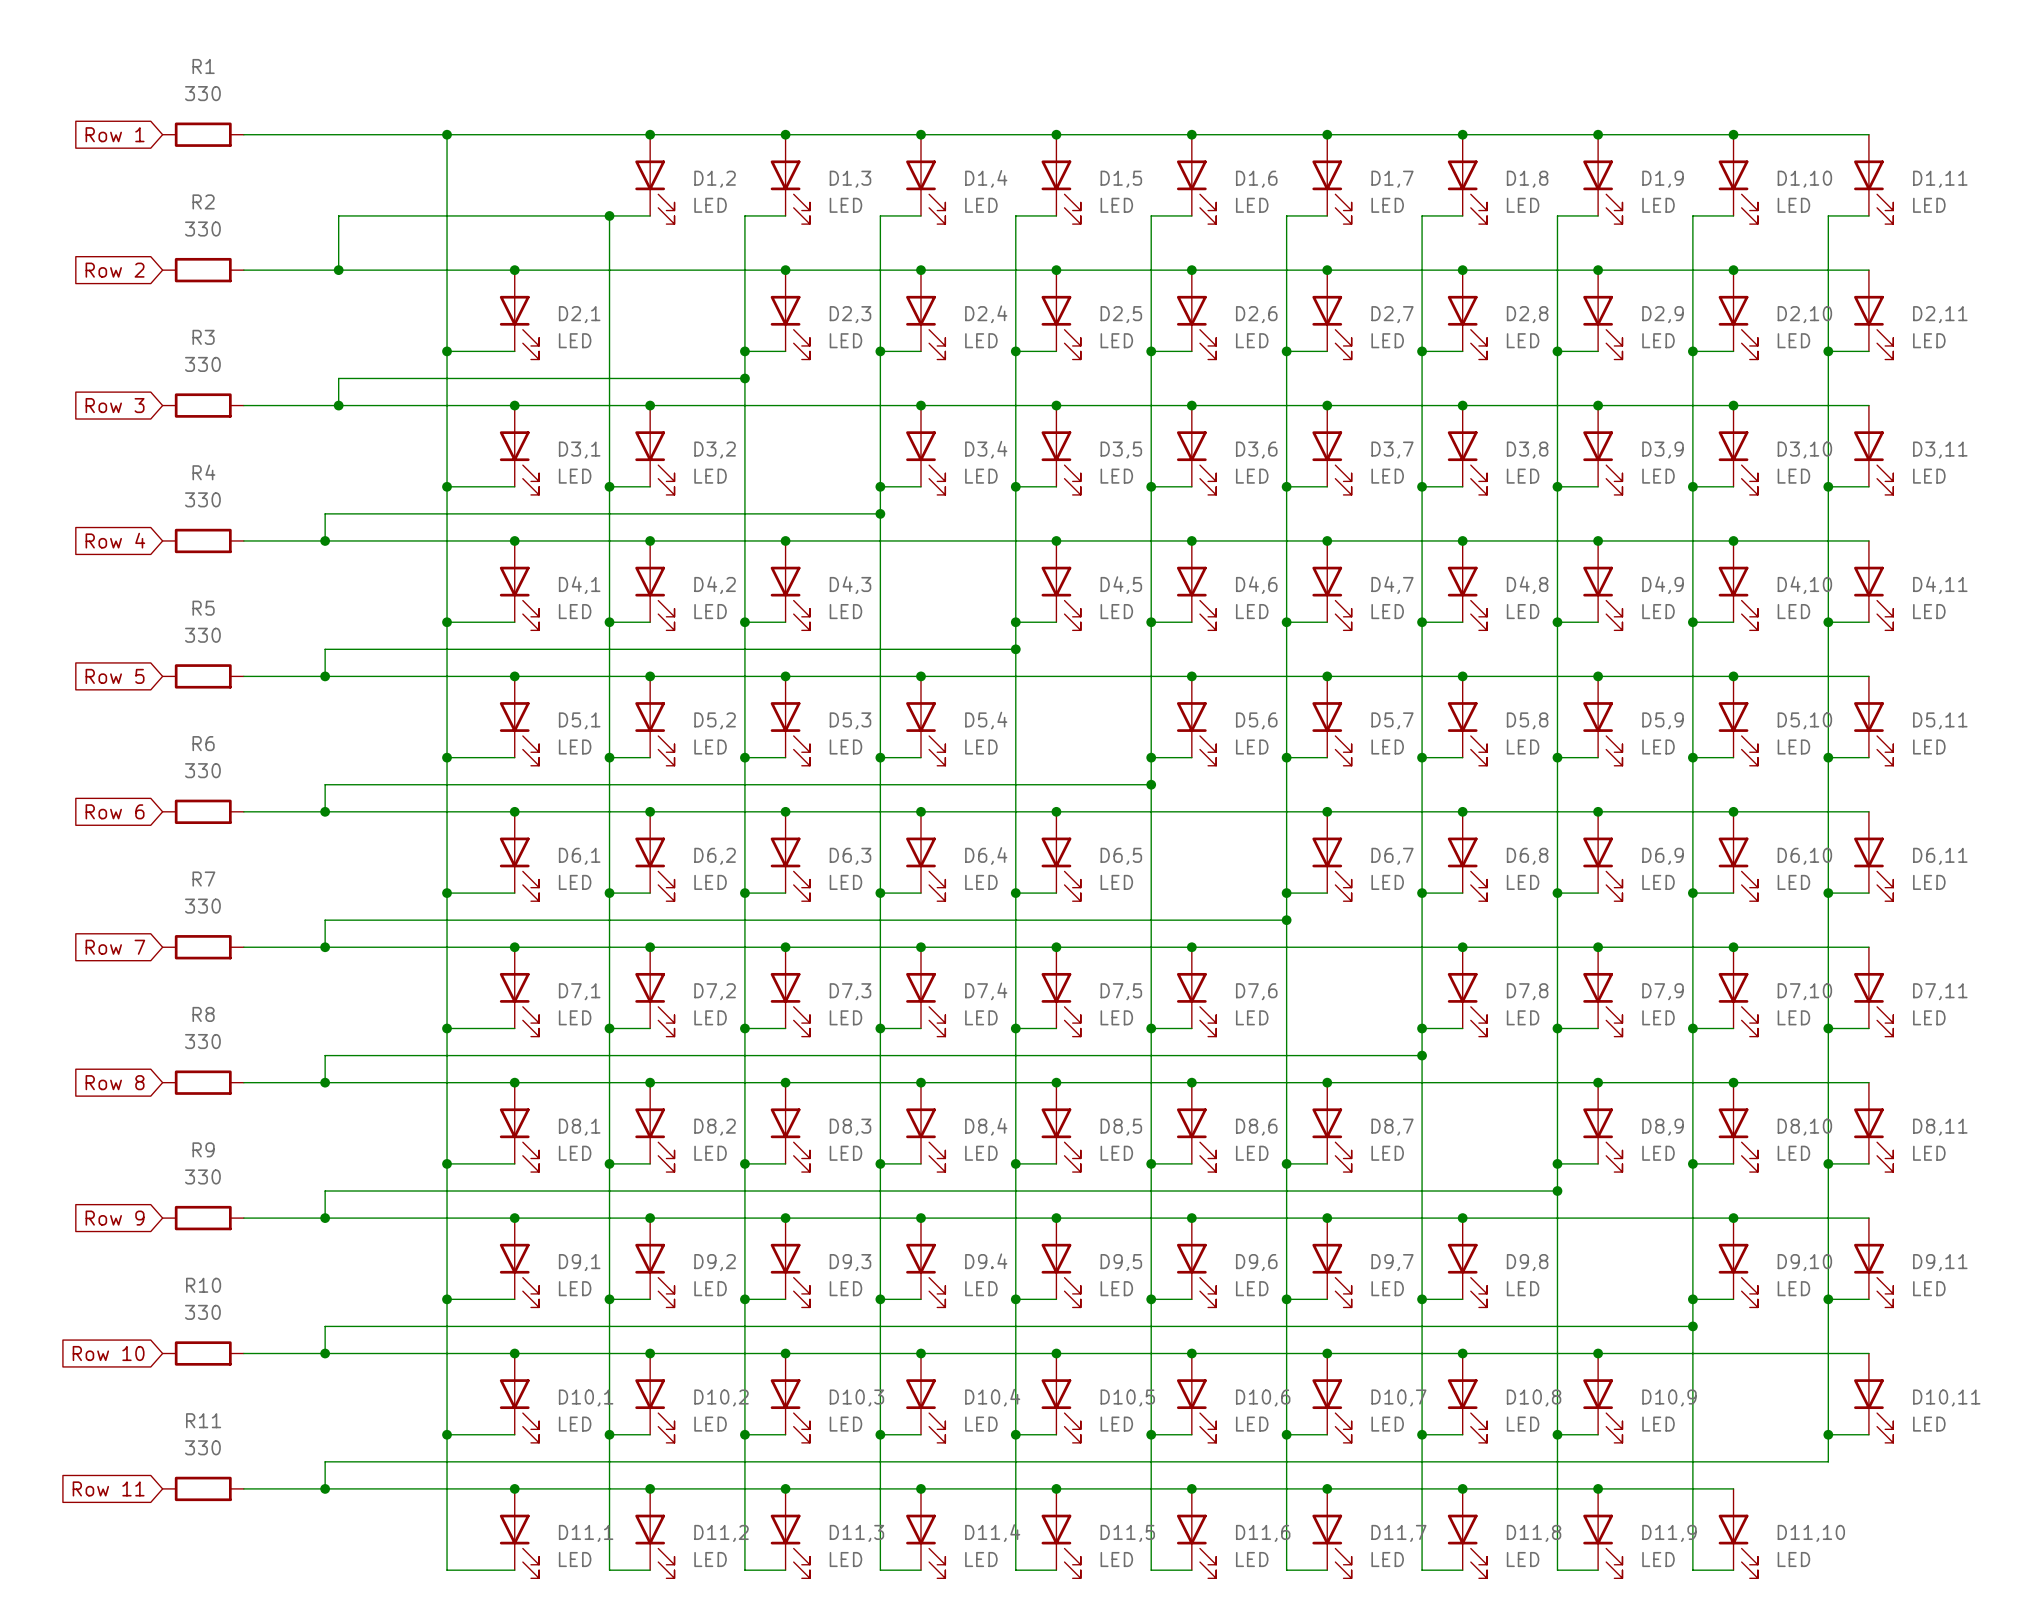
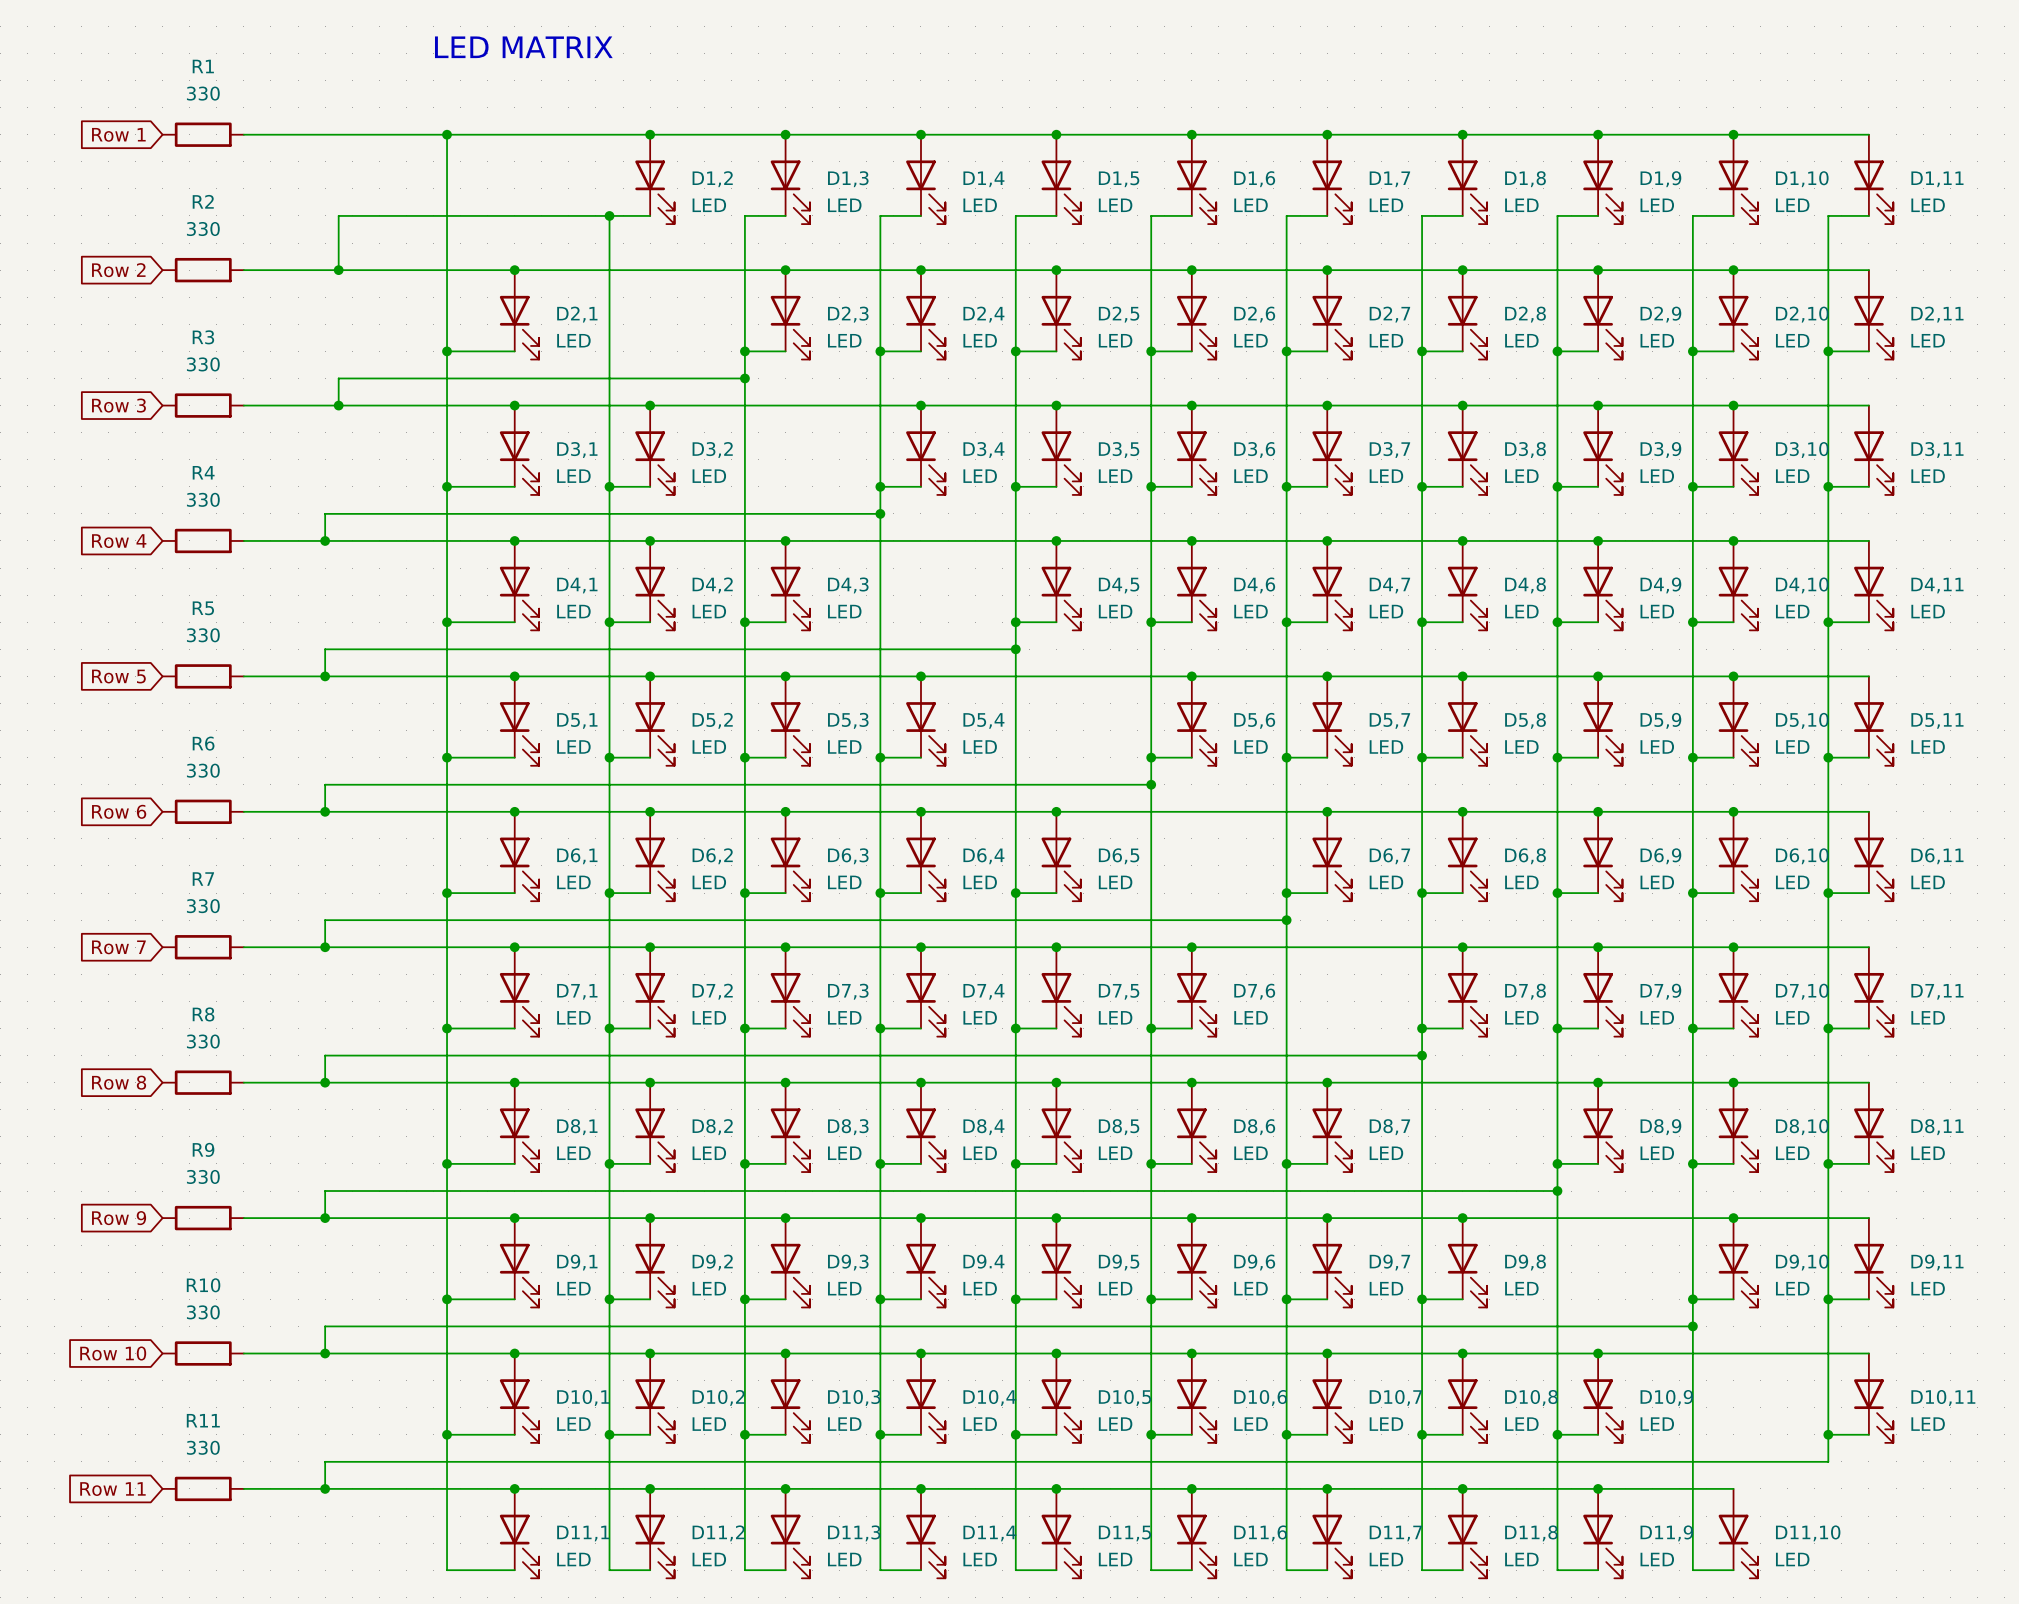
text: none -> LED MATRIX (523, 47)

